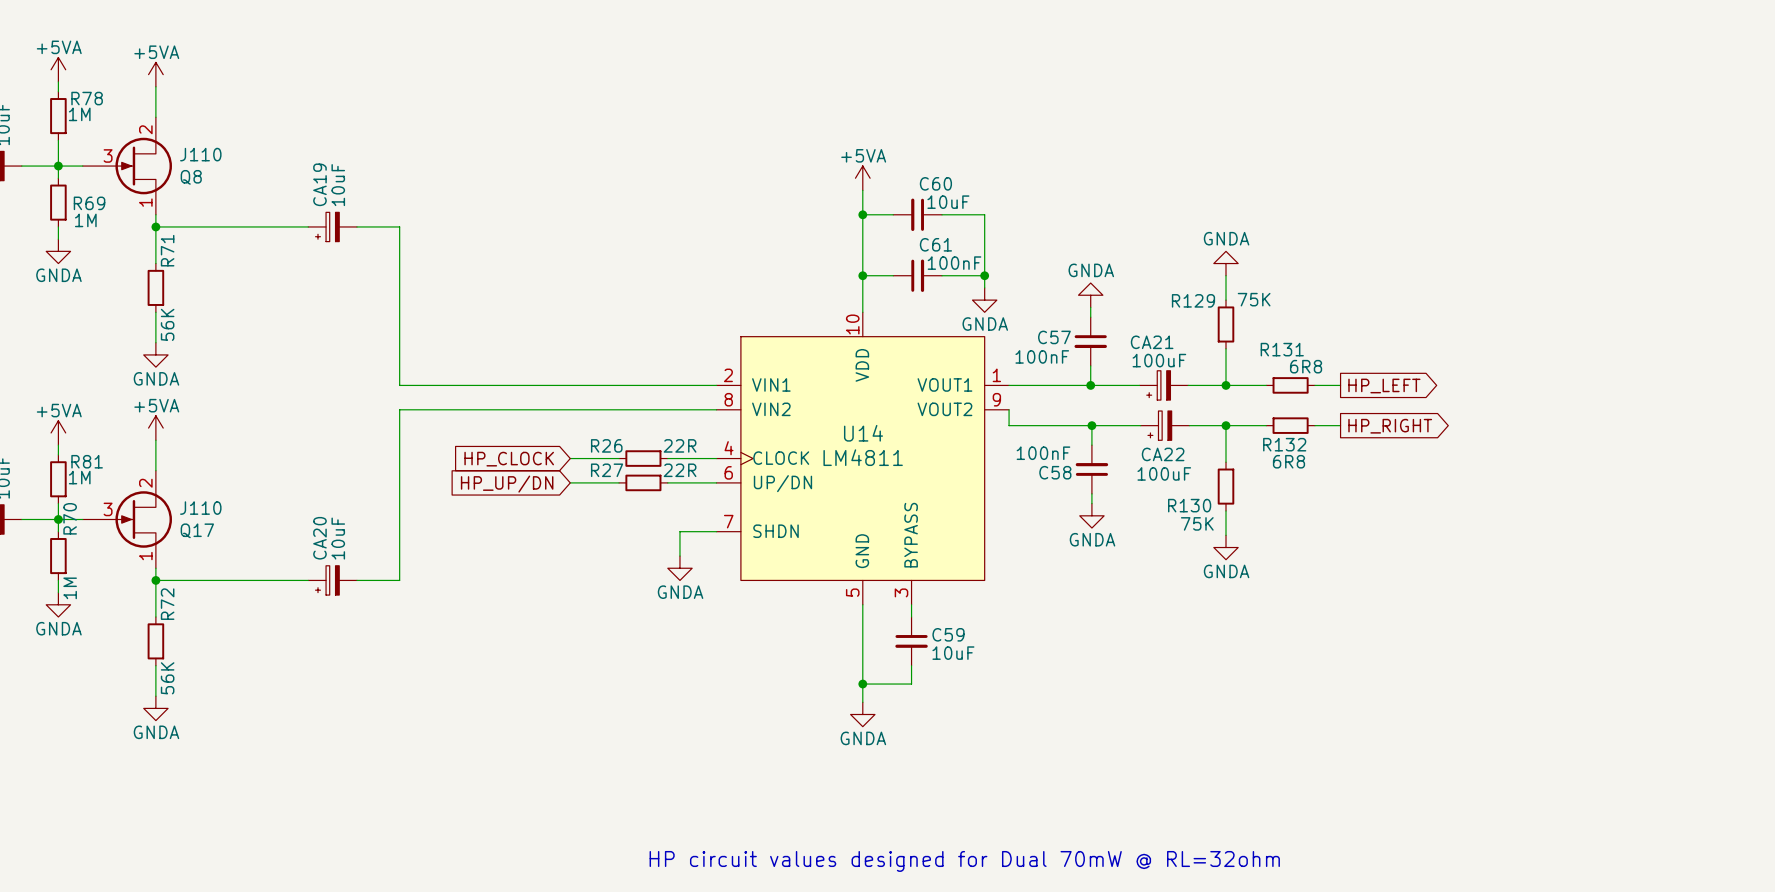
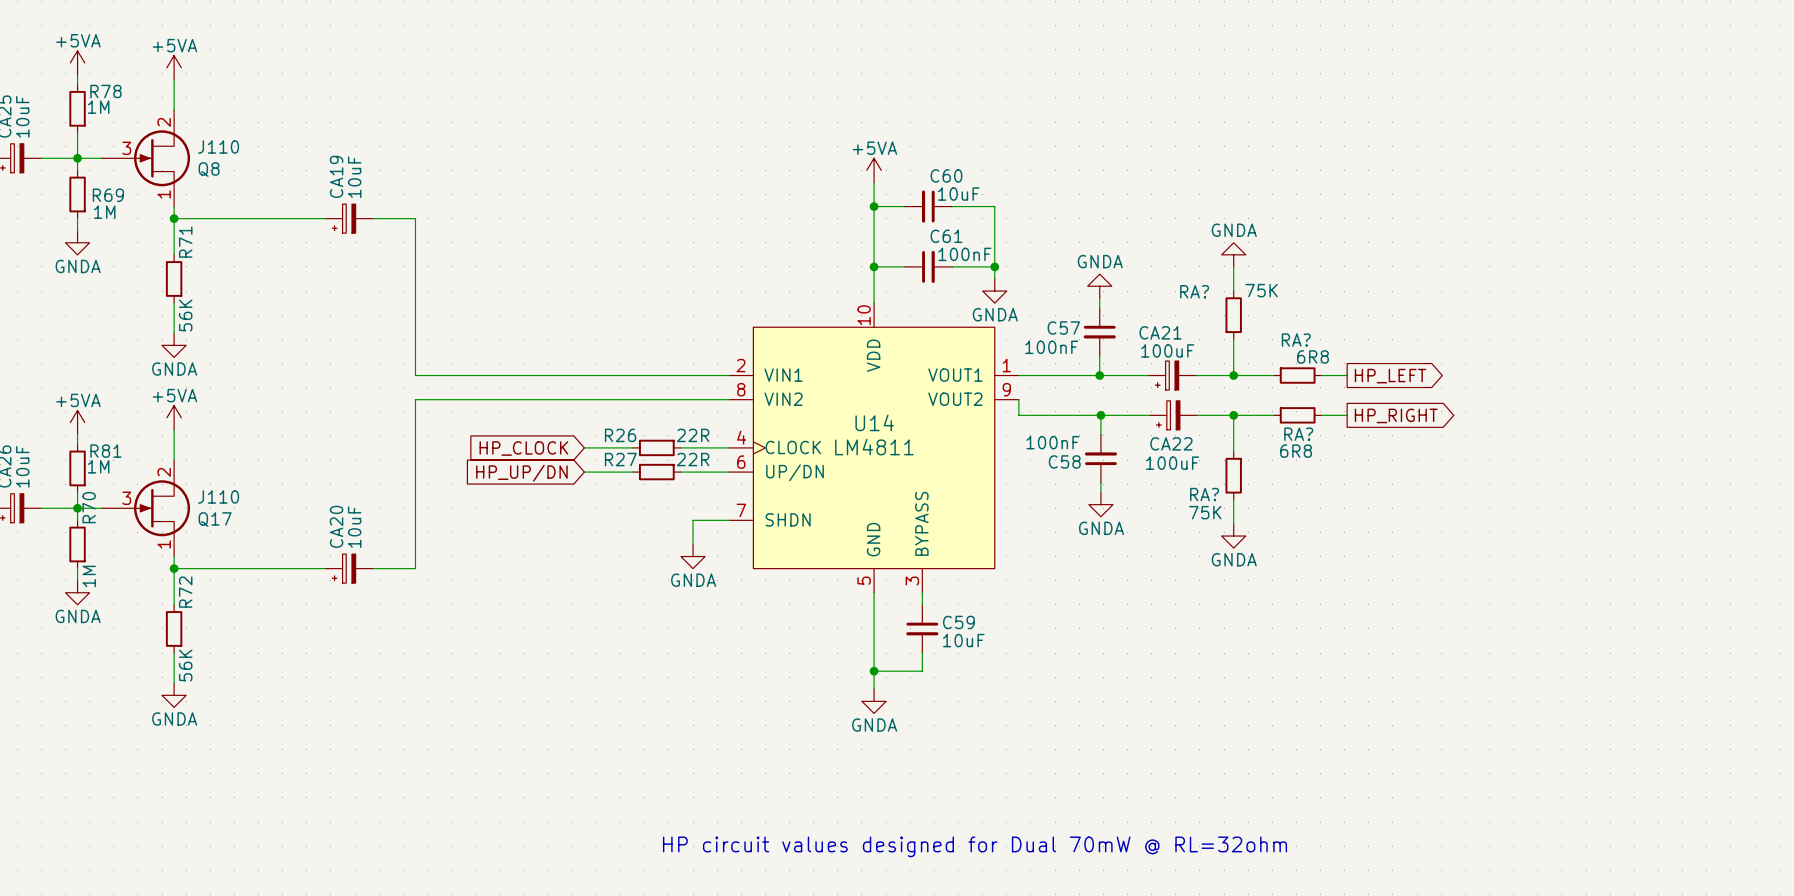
R129 name: R129 (1193, 300) -> RA? (1194, 291)
R131 name: R131 (1282, 349) -> RA? (1296, 340)
R132 name: R132 (1284, 444) -> RA? (1298, 434)
R130 name: R130 (1189, 505) -> RA? (1204, 494)

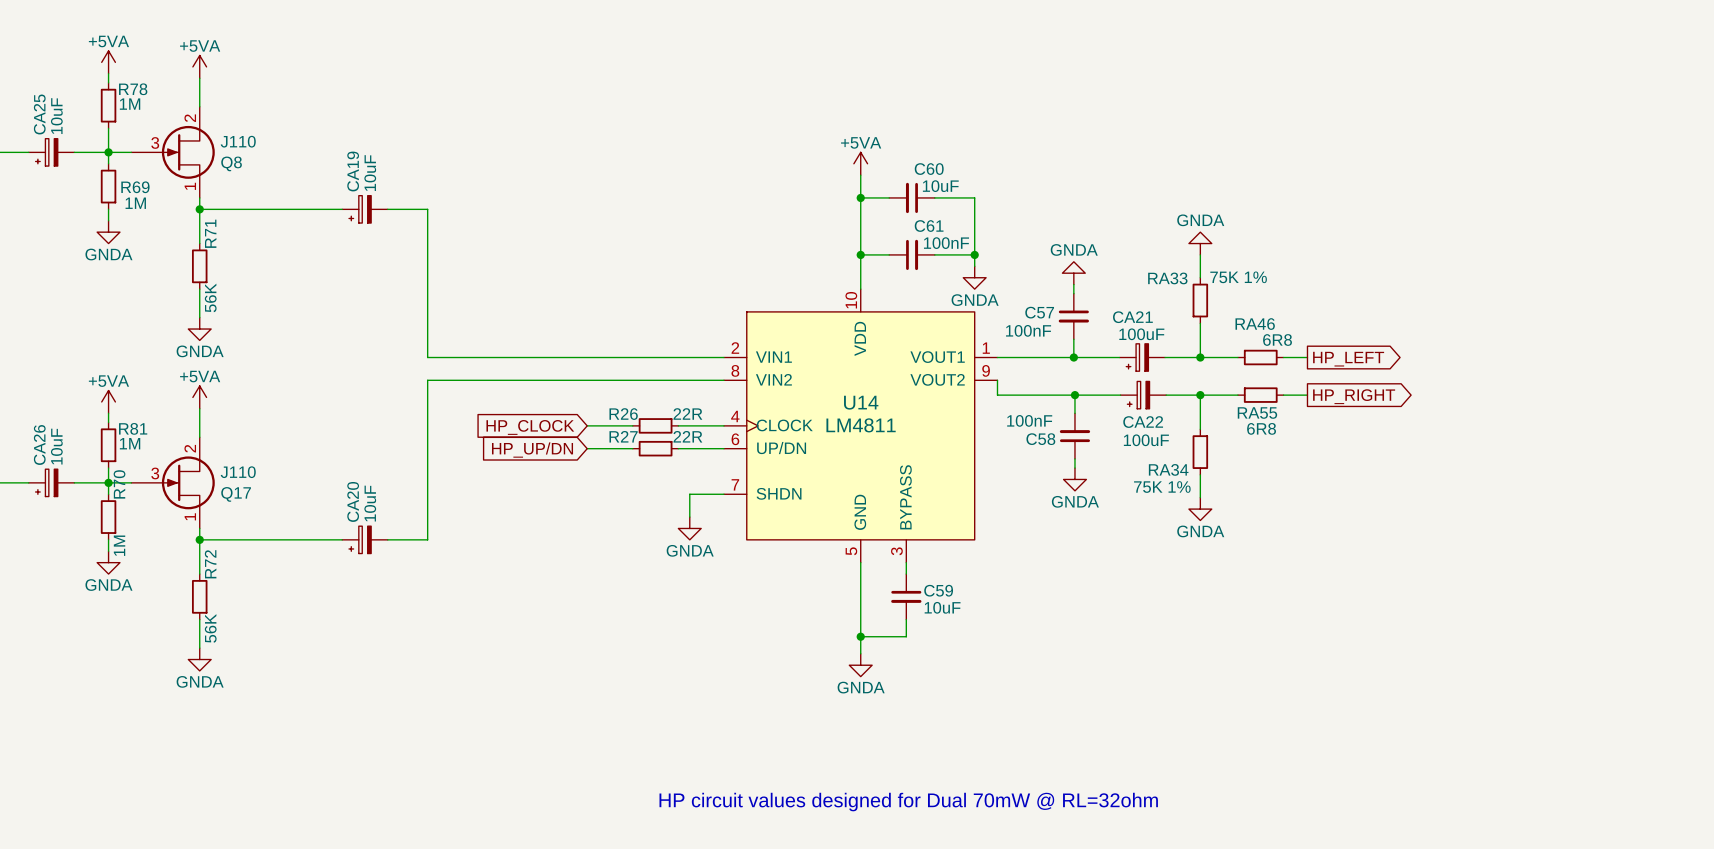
RA? value: 75K (1261, 290) -> 75K 1% (1238, 277)
RA? name: RA? (1194, 291) -> RA33 (1167, 278)
RA? name: RA? (1296, 340) -> RA46 (1255, 324)
RA? name: RA? (1298, 434) -> RA55 (1257, 413)
RA? name: RA? (1204, 494) -> RA34 (1168, 469)
RA? value: 75K (1205, 512) -> 75K 1% (1162, 487)

